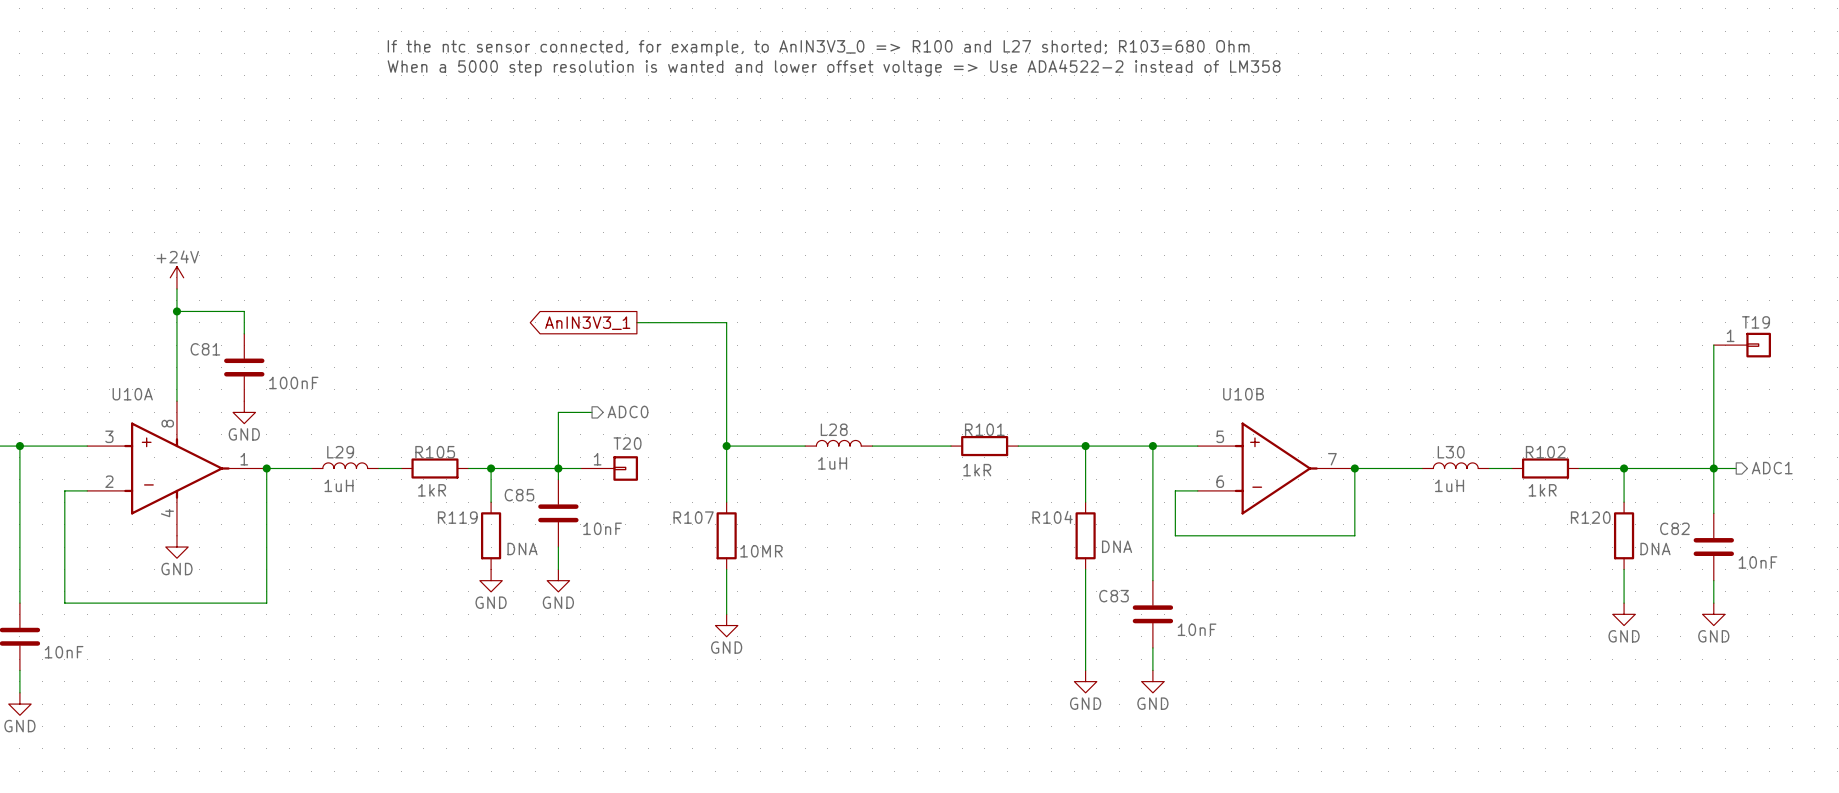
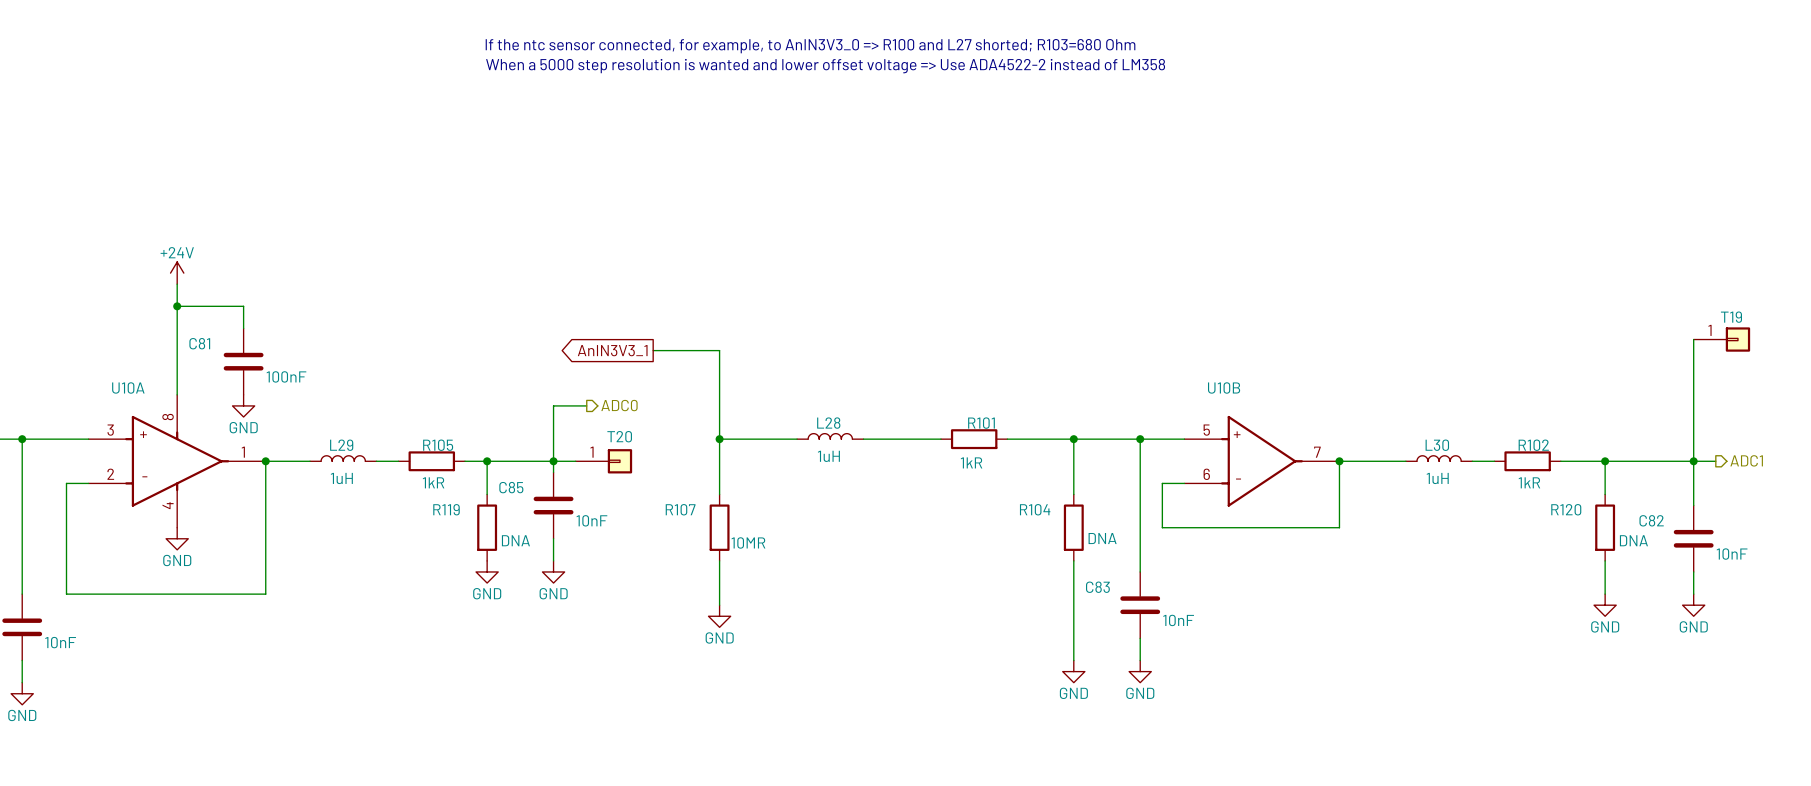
wire: (636, 322) (726, 322) (726, 356) -> (653, 350) (719, 350)
global label position: AnIN3V3_1 (587, 323) -> AnIN3V3_1 (612, 350)

